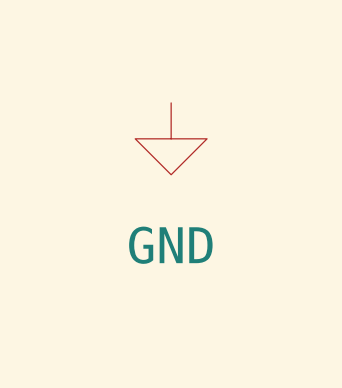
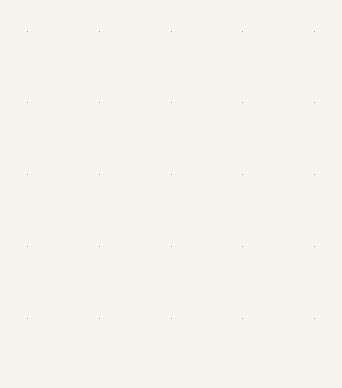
power symbol: GND (171, 138) -> none

